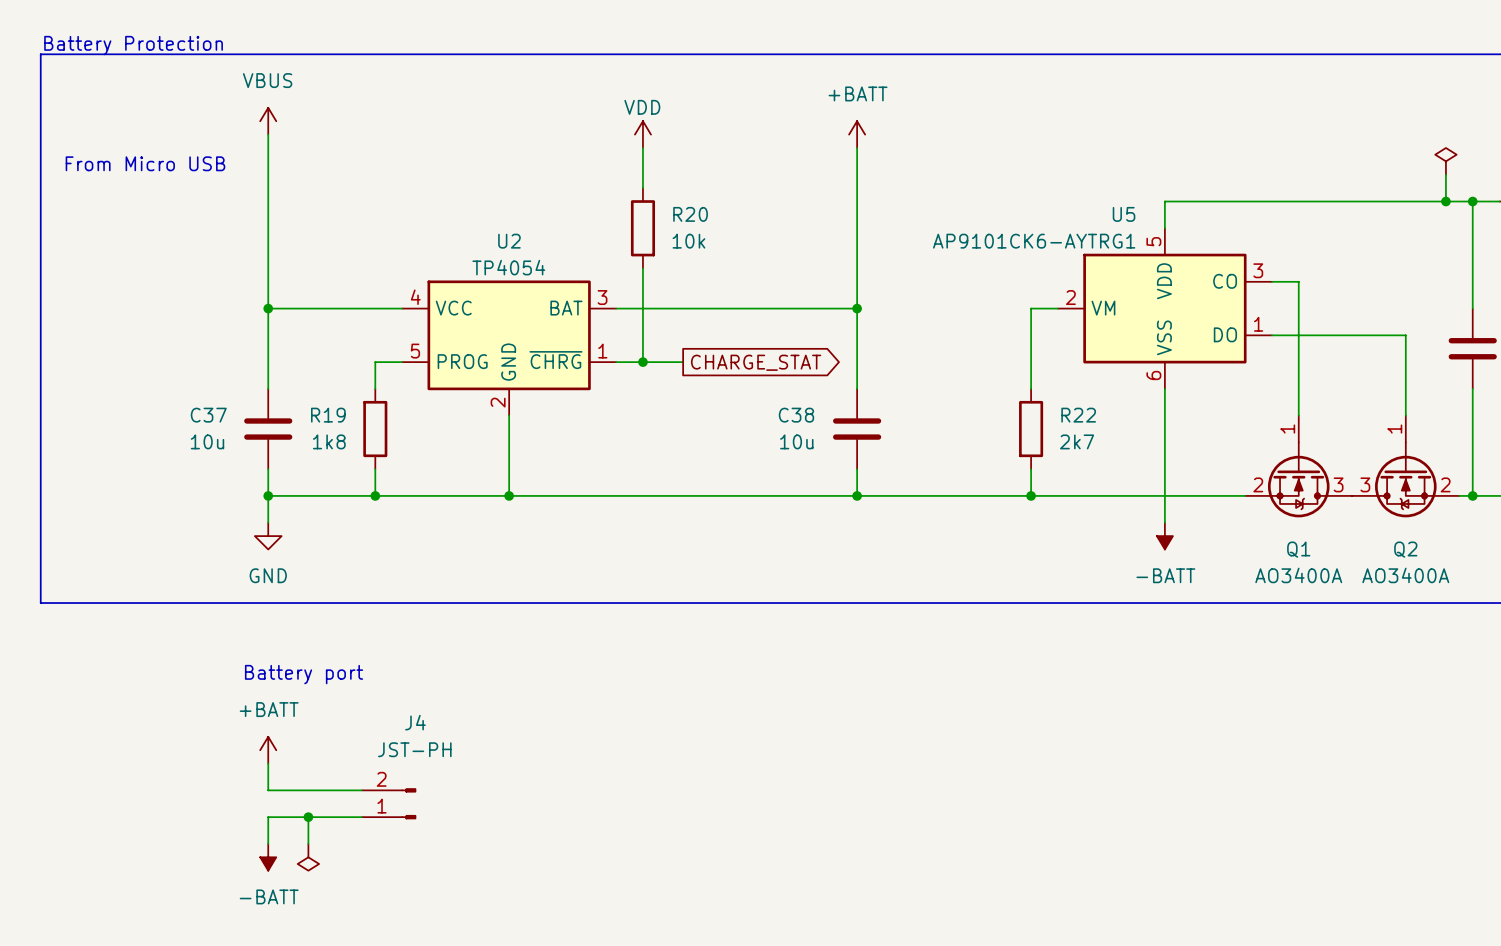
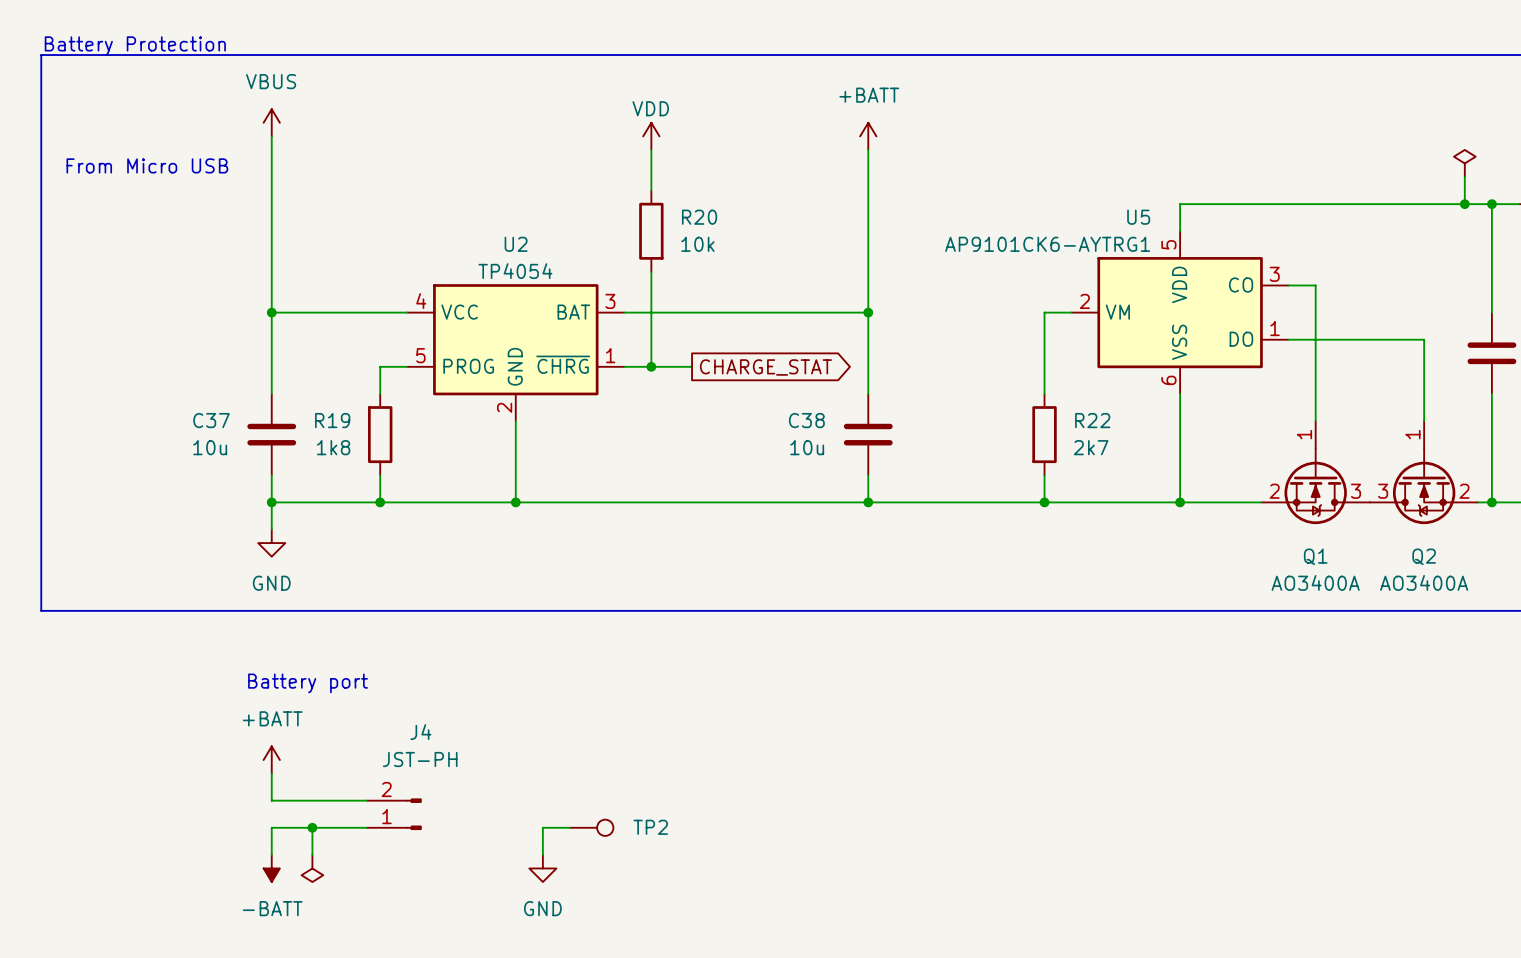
wire: (1164, 495) (1164, 522) -> none
junction: none -> (1180, 502)
power symbol: -BATT (1164, 536) -> none
wire: none -> (570, 827) (542, 827) (542, 854)
TP2: none -> (591, 827)
power symbol: none -> GND (542, 868)

